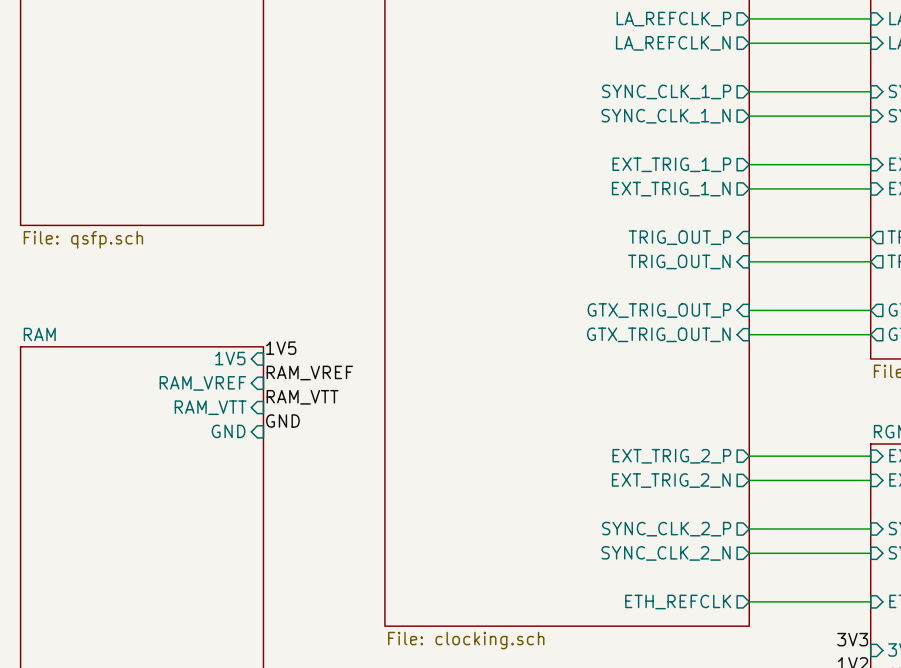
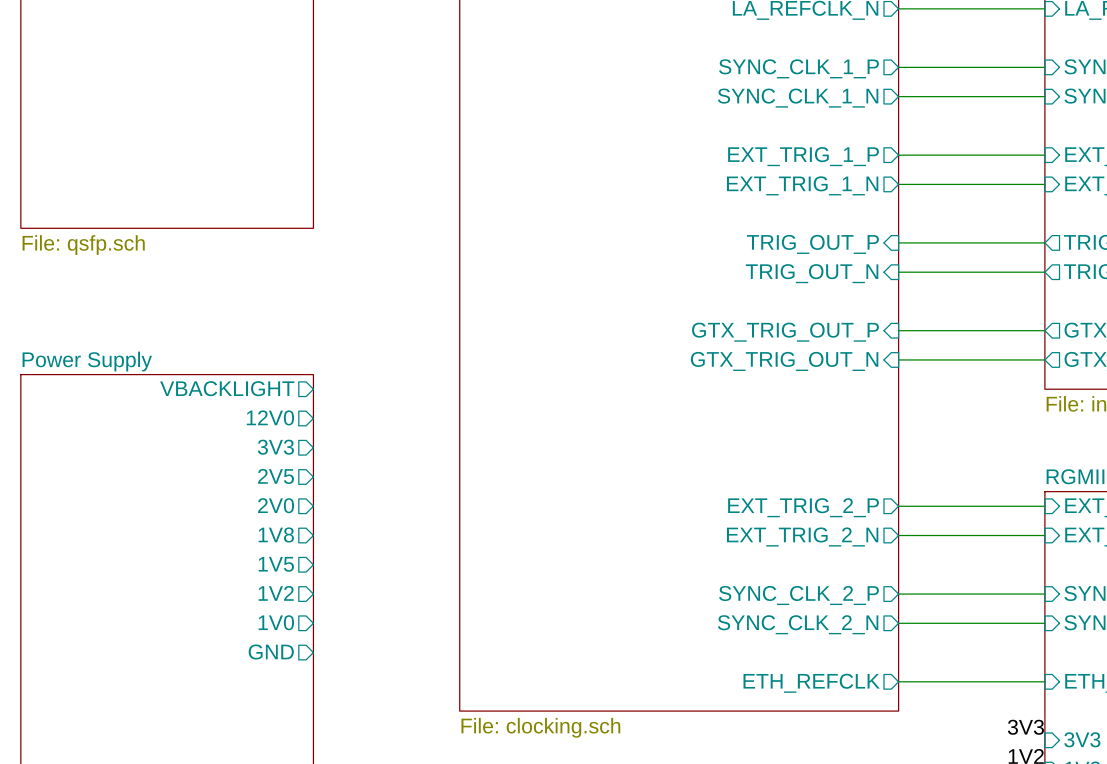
sheet RAM name: RAM (39, 334) -> Power Supply (87, 361)
label: 1V5 (281, 348) -> none
sheet pin shape: input (230, 358) -> output (227, 388)
sheet pin: 1V5 (230, 358) -> VBACKLIGHT (227, 388)
label: RAM_VREF (309, 373) -> none
sheet pin shape: input (202, 383) -> output (270, 417)
sheet pin: RAM_VREF (202, 383) -> 12V0 (270, 417)
label: RAM_VTT (302, 397) -> none
sheet pin shape: input (210, 407) -> output (275, 447)
sheet pin: RAM_VTT (210, 407) -> 3V3 (275, 447)
label: GND (282, 421) -> none
sheet pin shape: input (228, 431) -> output (276, 476)
sheet pin: GND (228, 431) -> 2V5 (276, 476)
sheet pin: none -> 2V0 (276, 505)
sheet pin: none -> 1V8 (276, 534)
sheet pin: none -> 1V5 (276, 564)
sheet pin: none -> 1V2 (276, 593)
sheet pin: none -> 1V0 (276, 622)
sheet pin: none -> GND (271, 652)

